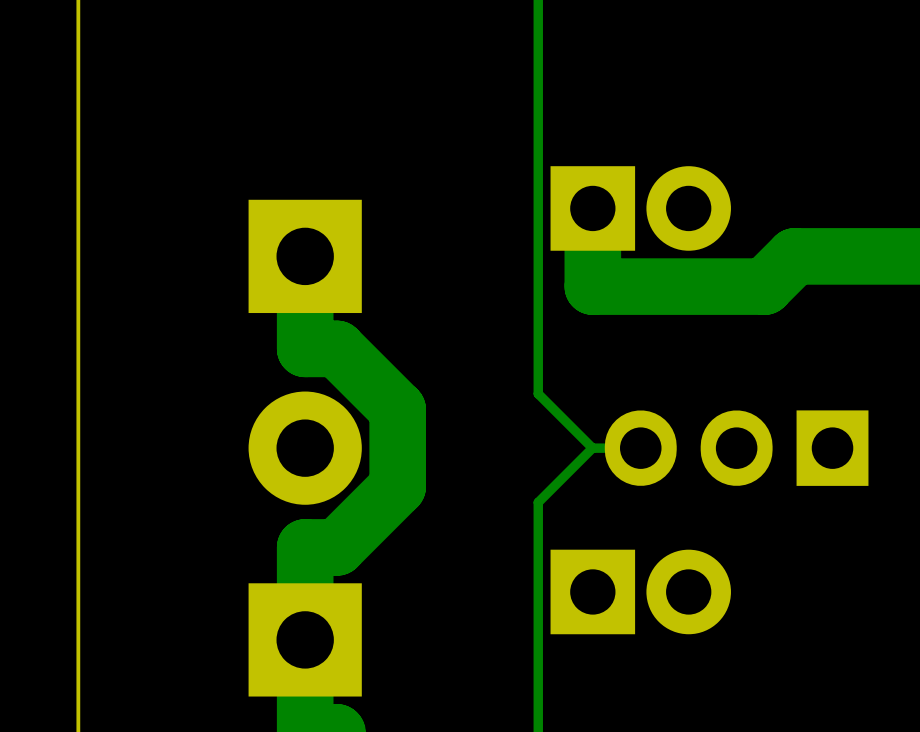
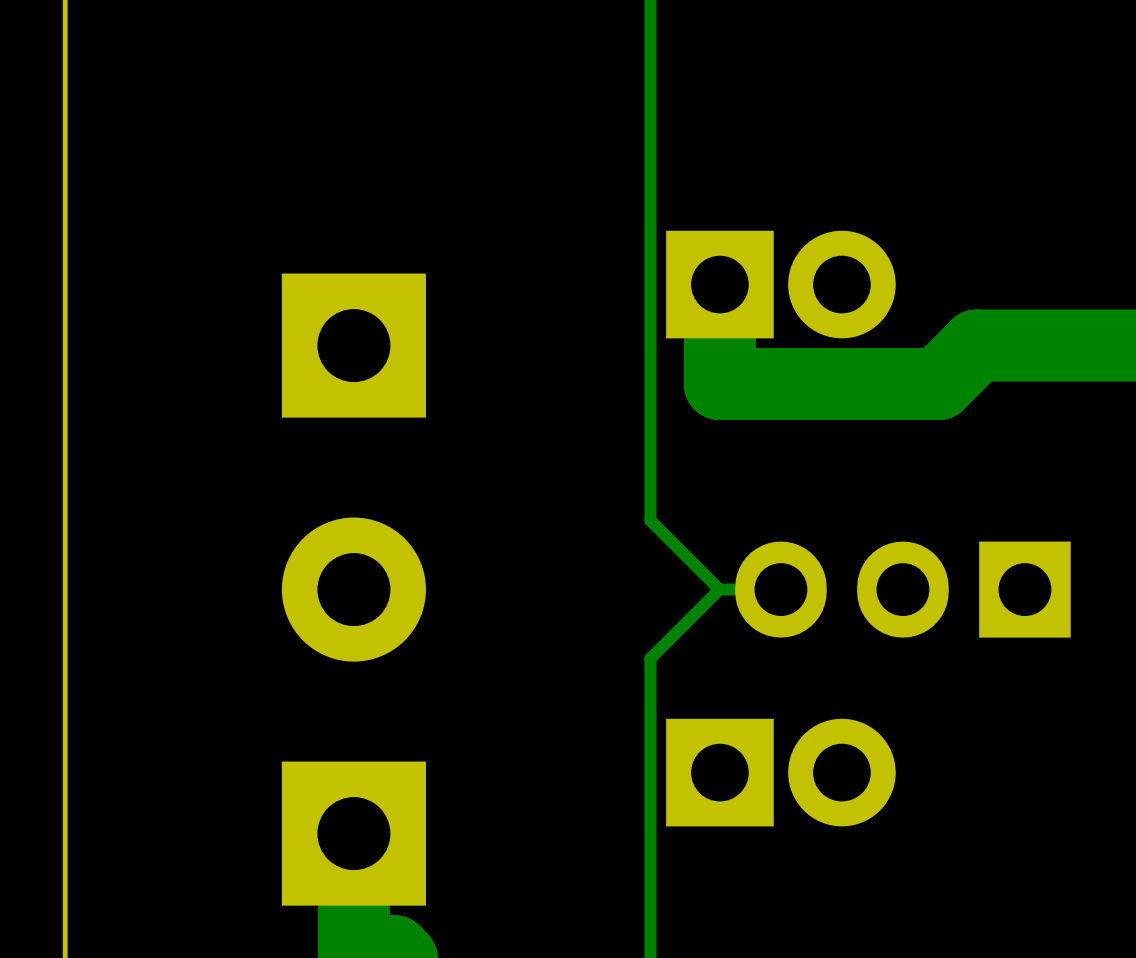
track: (305, 256) (305, 348) (336, 348) (397, 409) (397, 486) (336, 547) (305, 547) (305, 639) -> none

